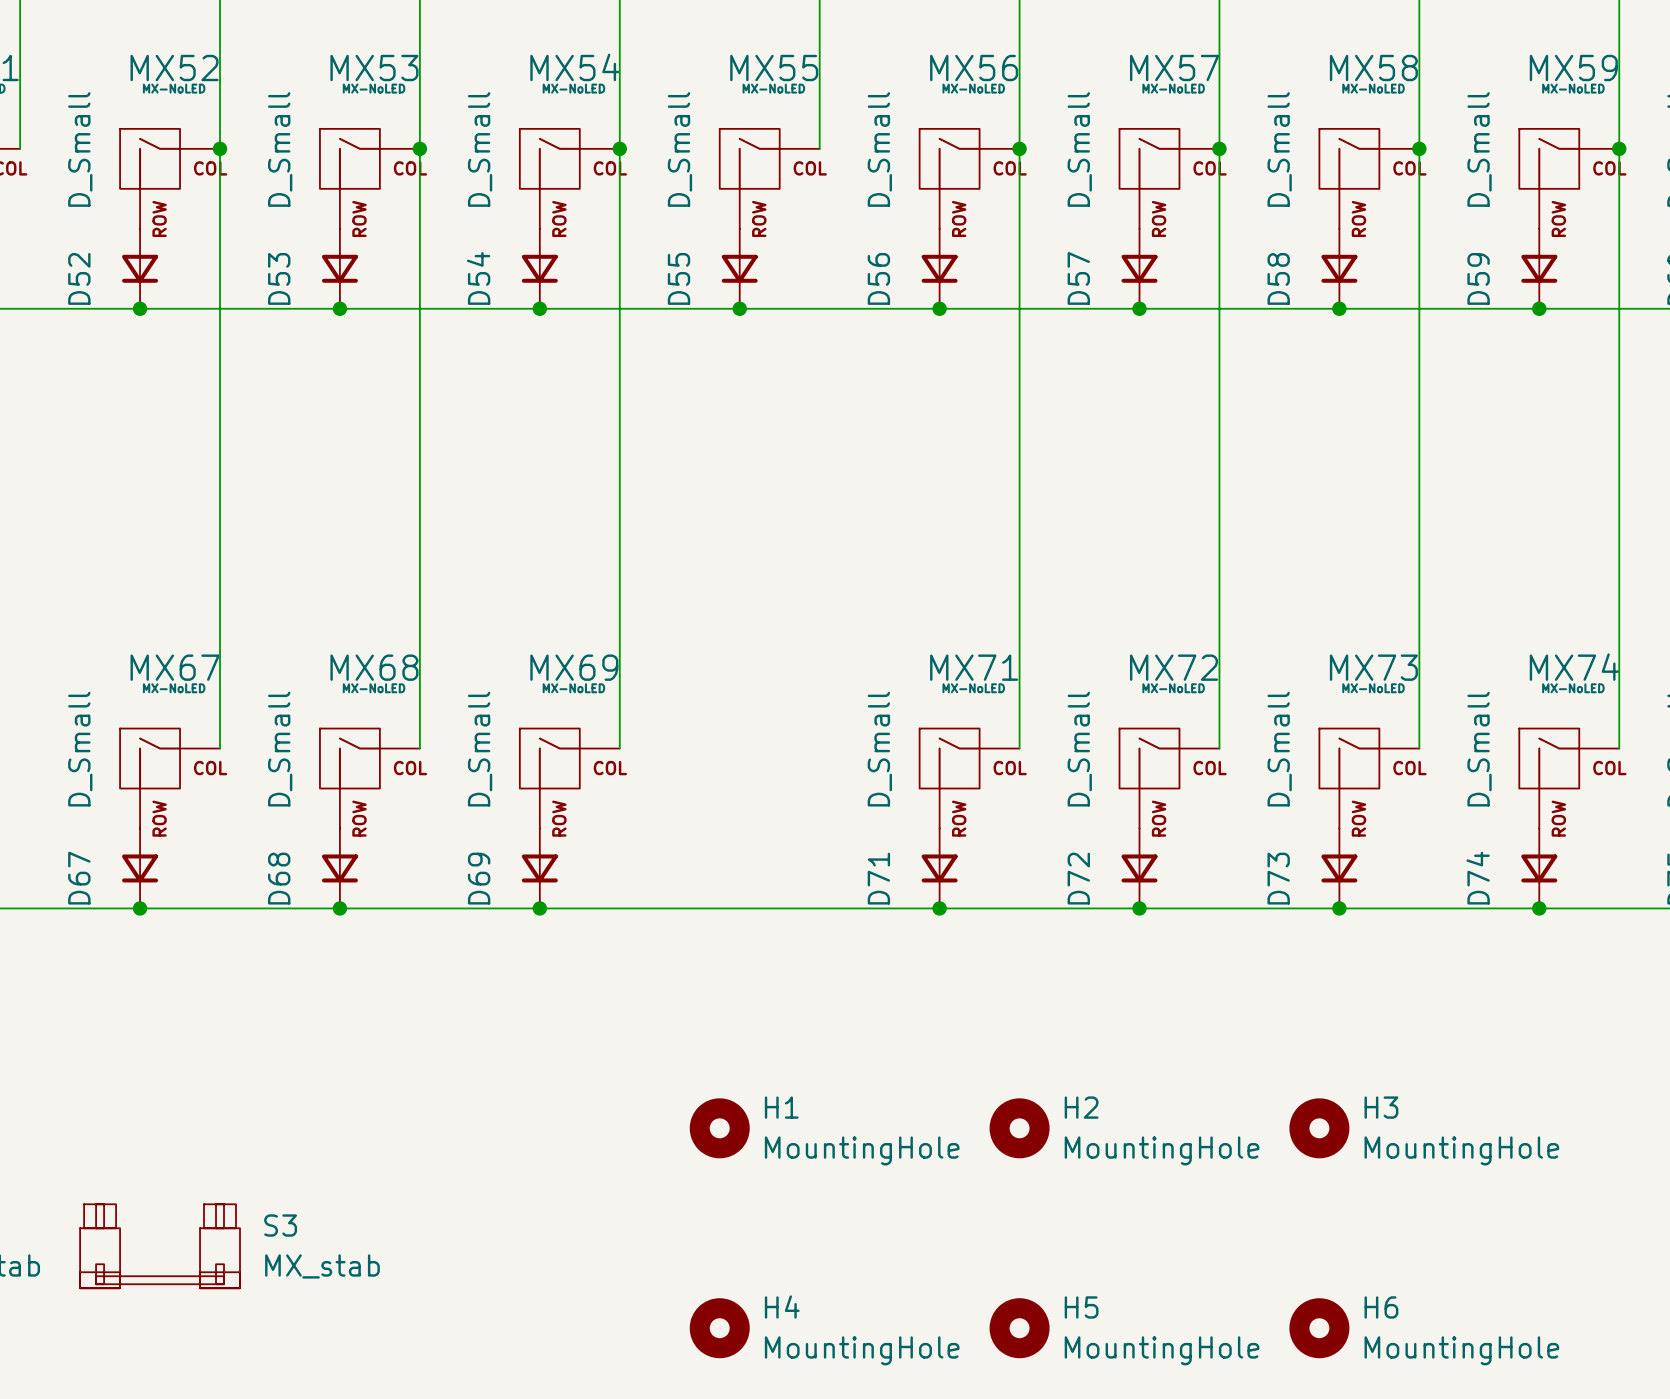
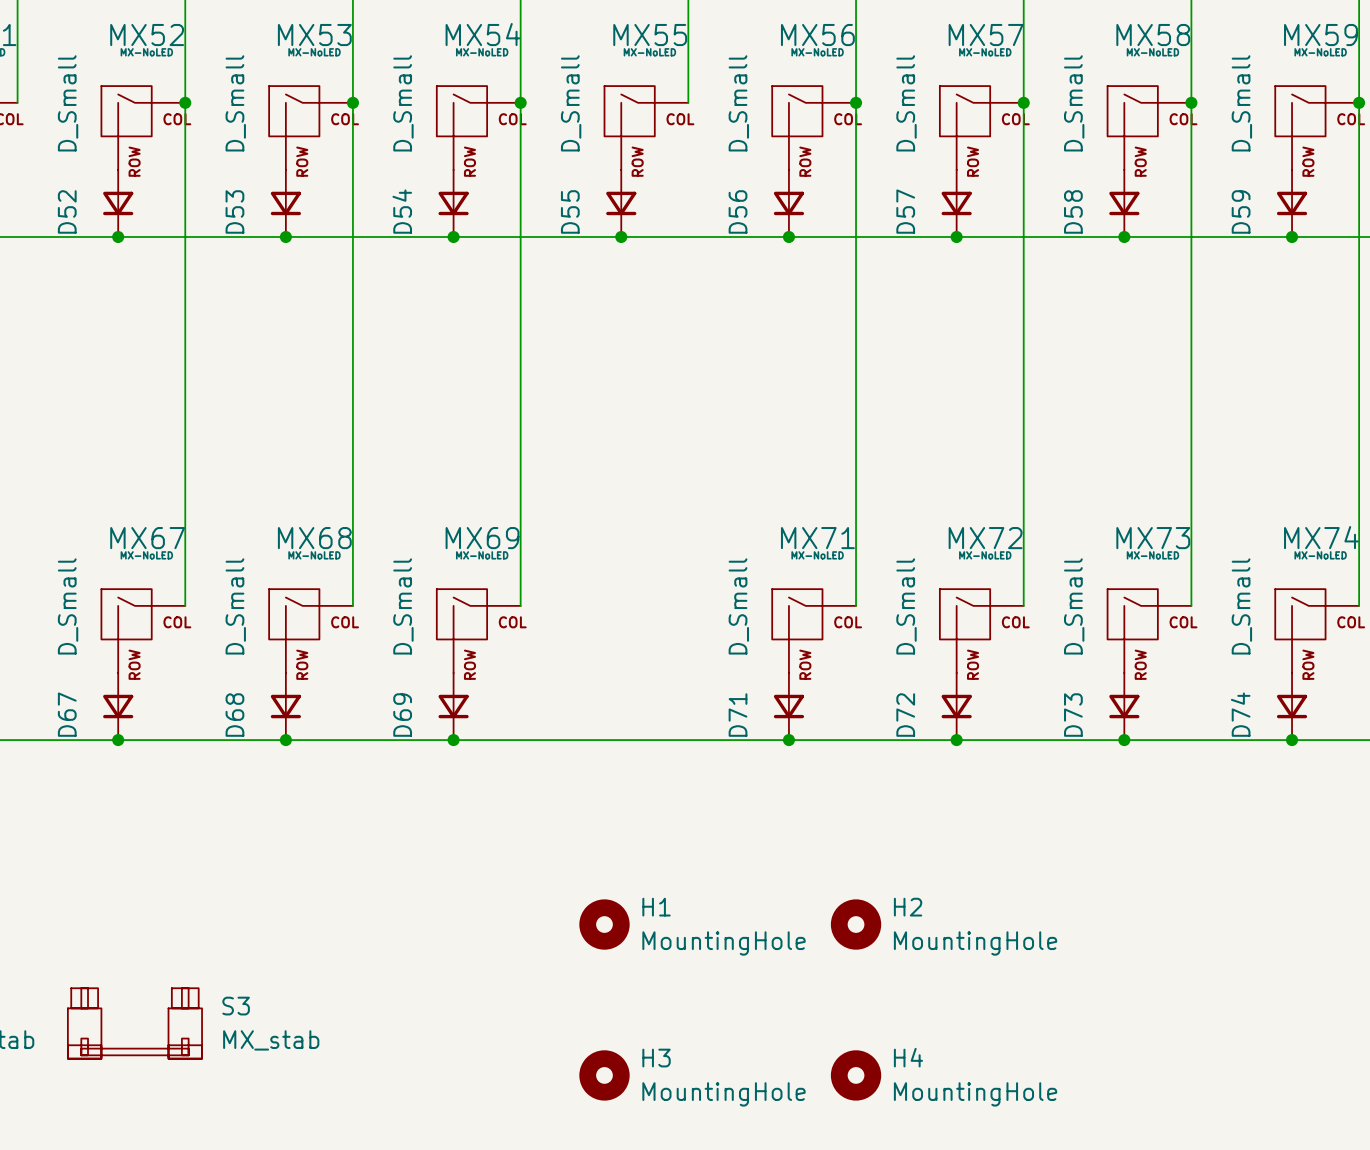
H3 position: (1319, 1128) -> (604, 1075)
H4 position: (719, 1328) -> (856, 1075)
H5: MountingHole (1019, 1328) -> none
H6: MountingHole (1319, 1328) -> none

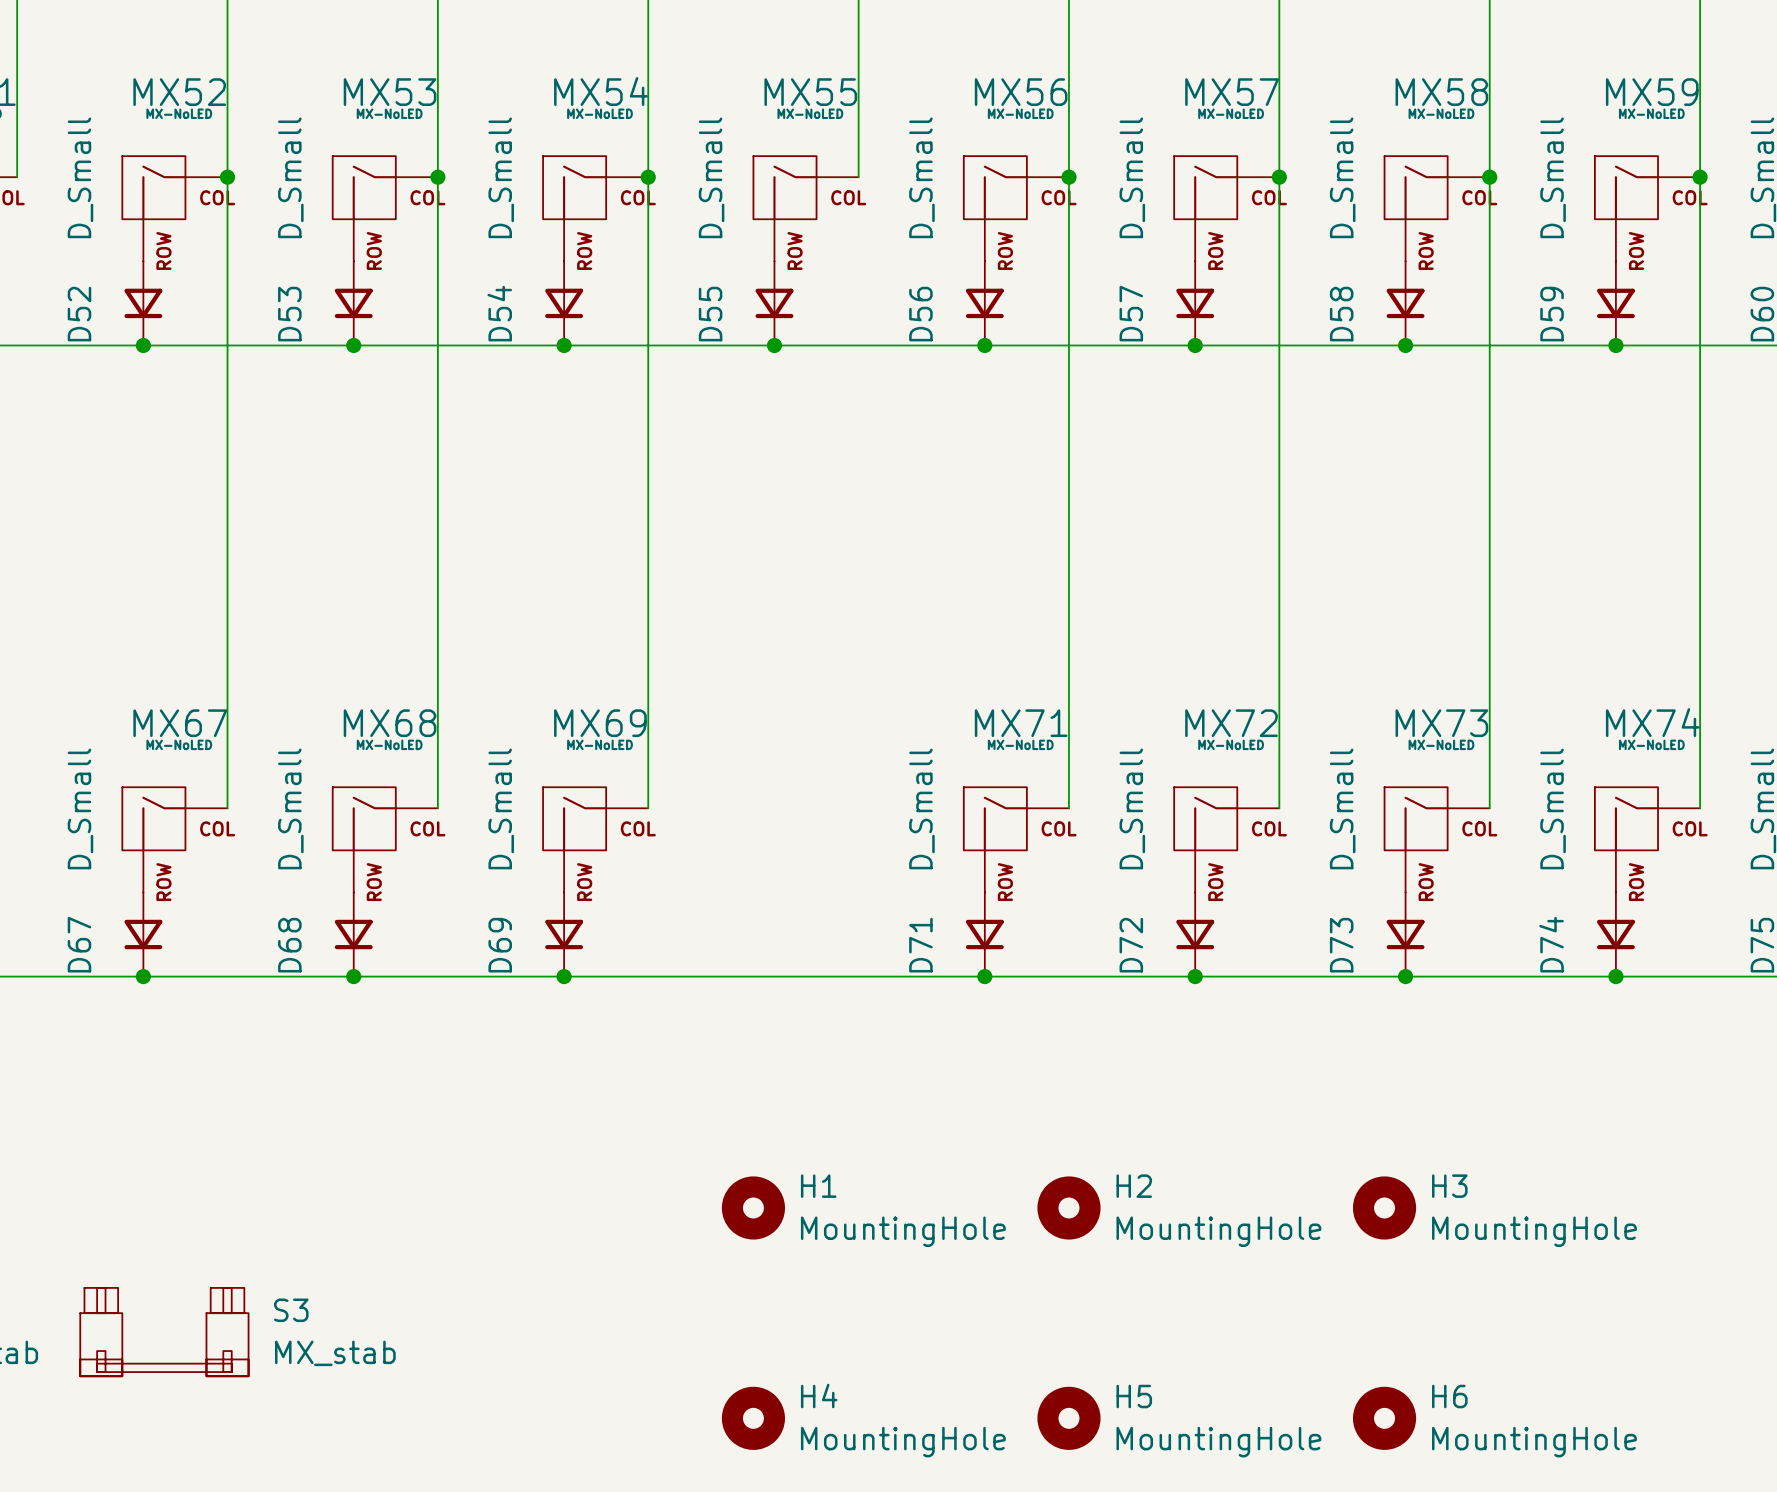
H3 position: (604, 1075) -> (1384, 1207)
H4 position: (856, 1075) -> (753, 1418)
H5: none -> MountingHole (1068, 1418)
H6: none -> MountingHole (1384, 1418)

